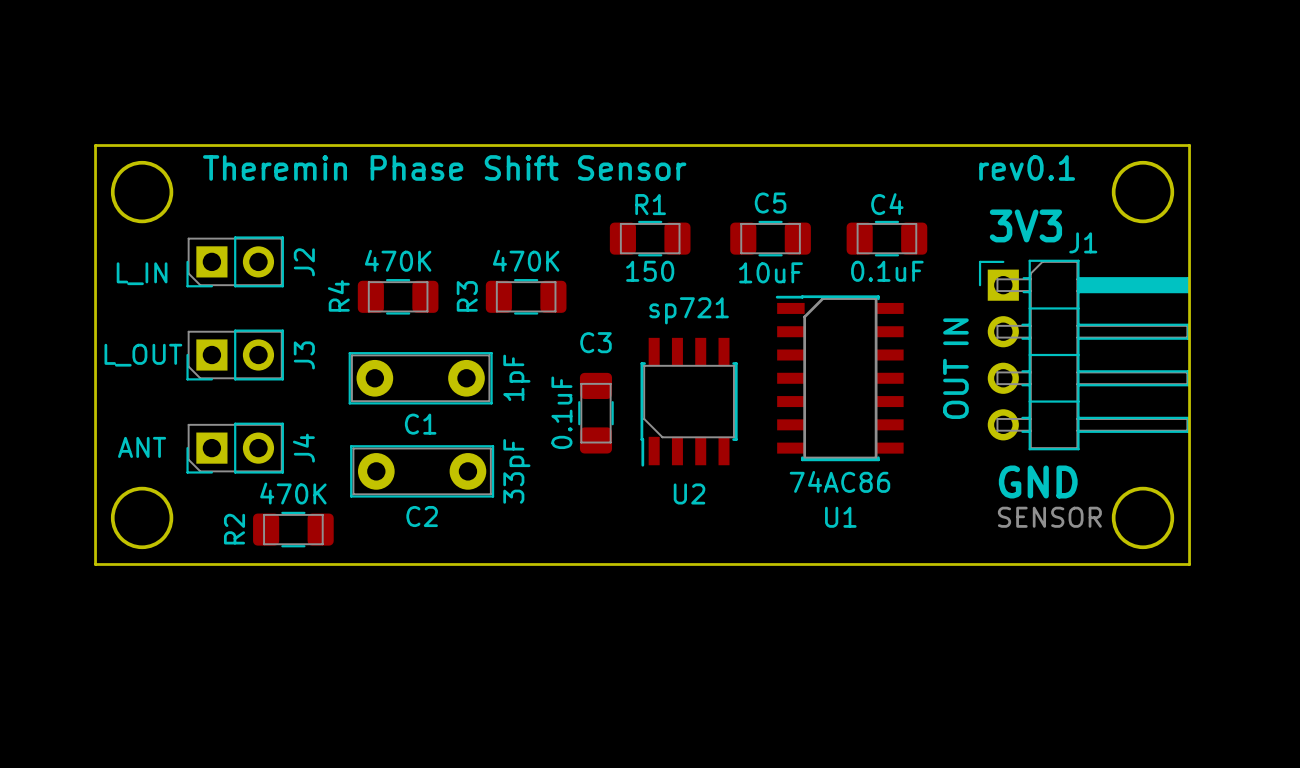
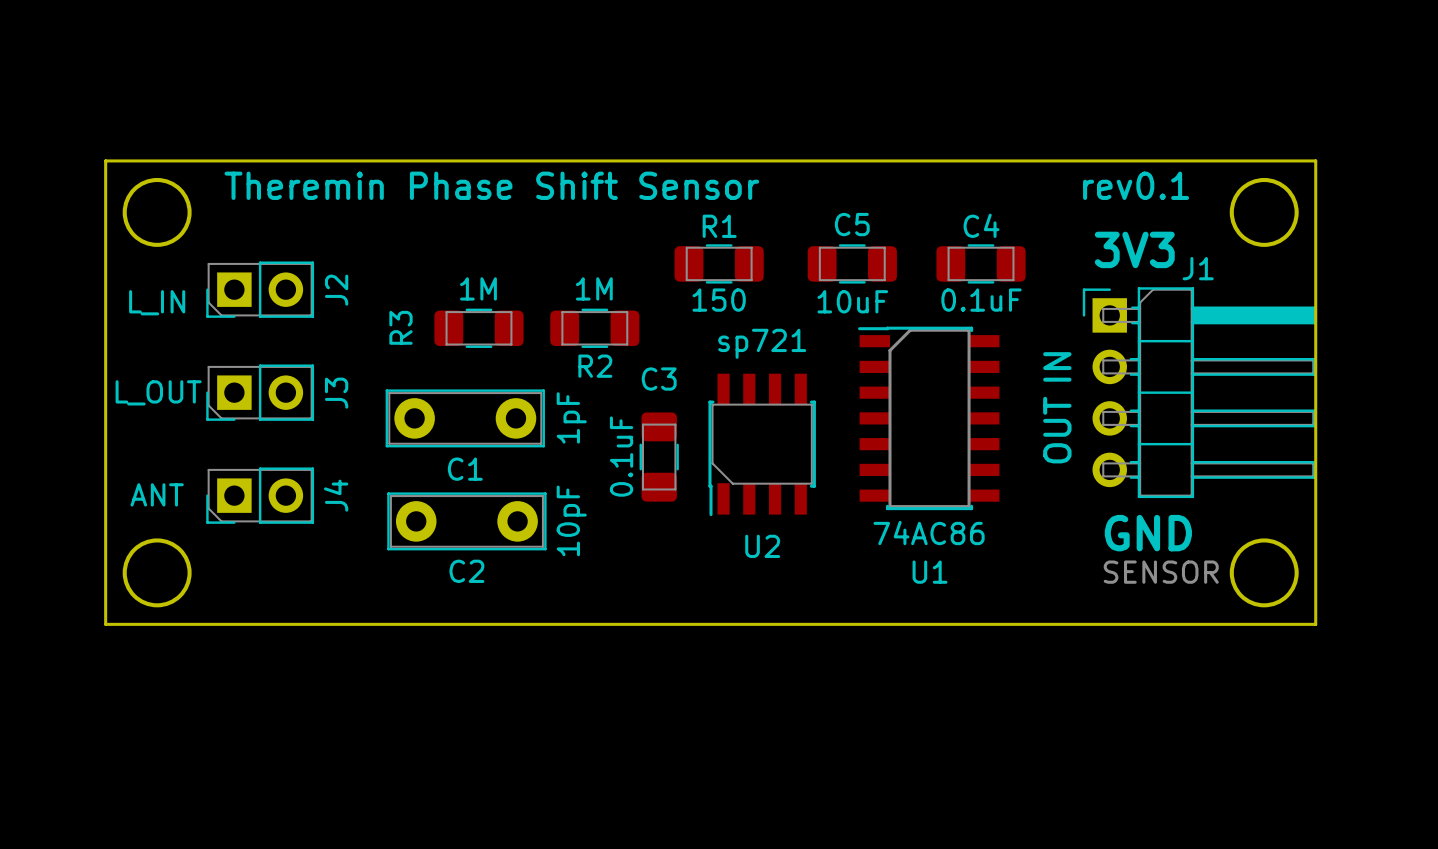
R3 value: 470K (526, 260) -> 1M (478, 288)
R4: 470K (398, 296) -> none
R3 name position: R3 (467, 296) -> R3 (400, 327)
R3 position: (526, 296) -> (478, 328)
C2 value: 33pF (516, 471) -> 10pF (571, 520)
R2 value: 470K (293, 493) -> 1M (594, 288)
R2 name rotation: 0° (234, 529) -> 90° clockwise (595, 366)
R2 name position: R2 (234, 529) -> R2 (595, 366)
R2 position: (293, 529) -> (594, 328)

